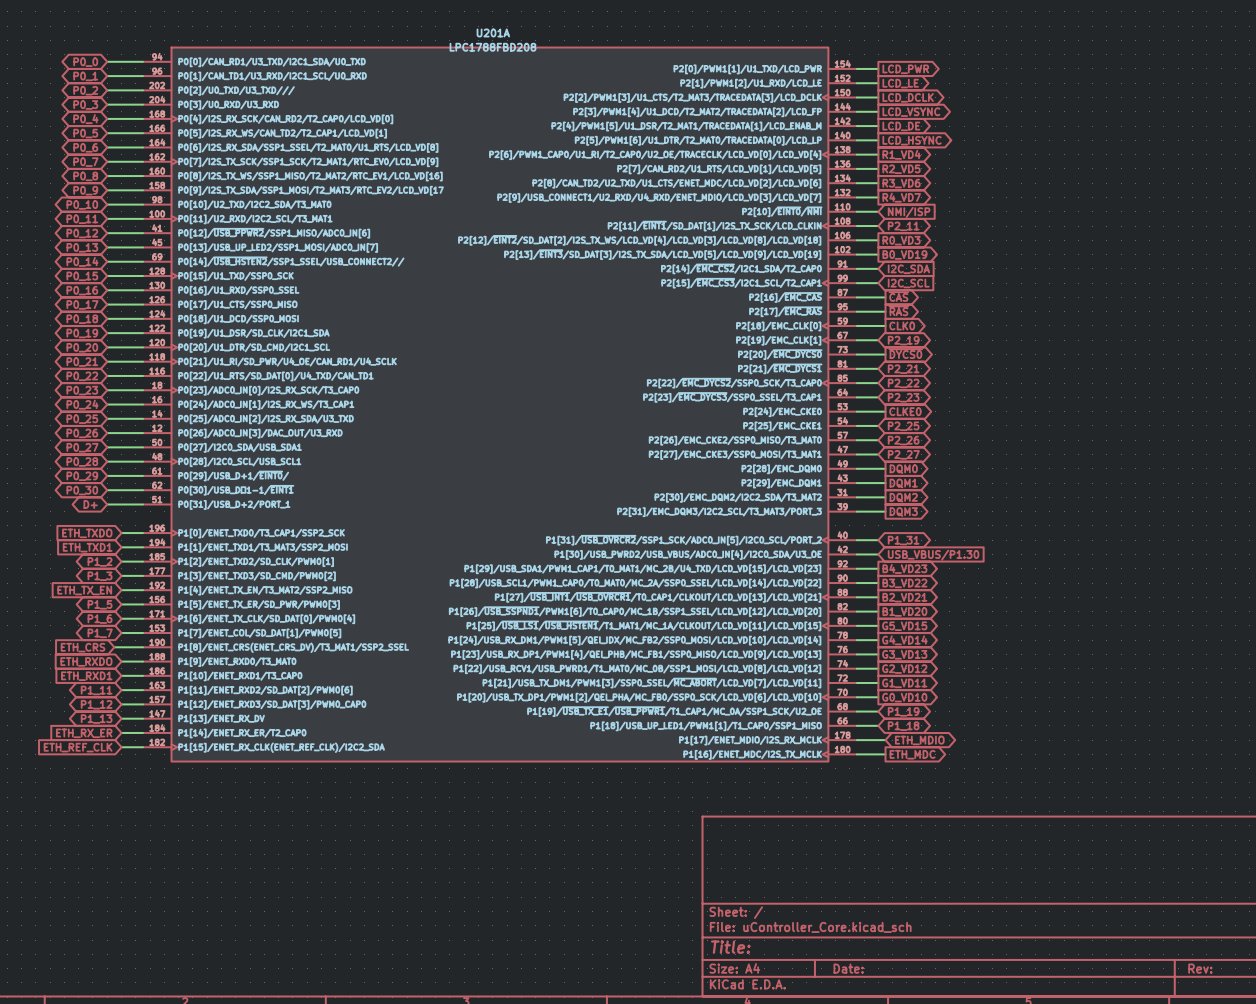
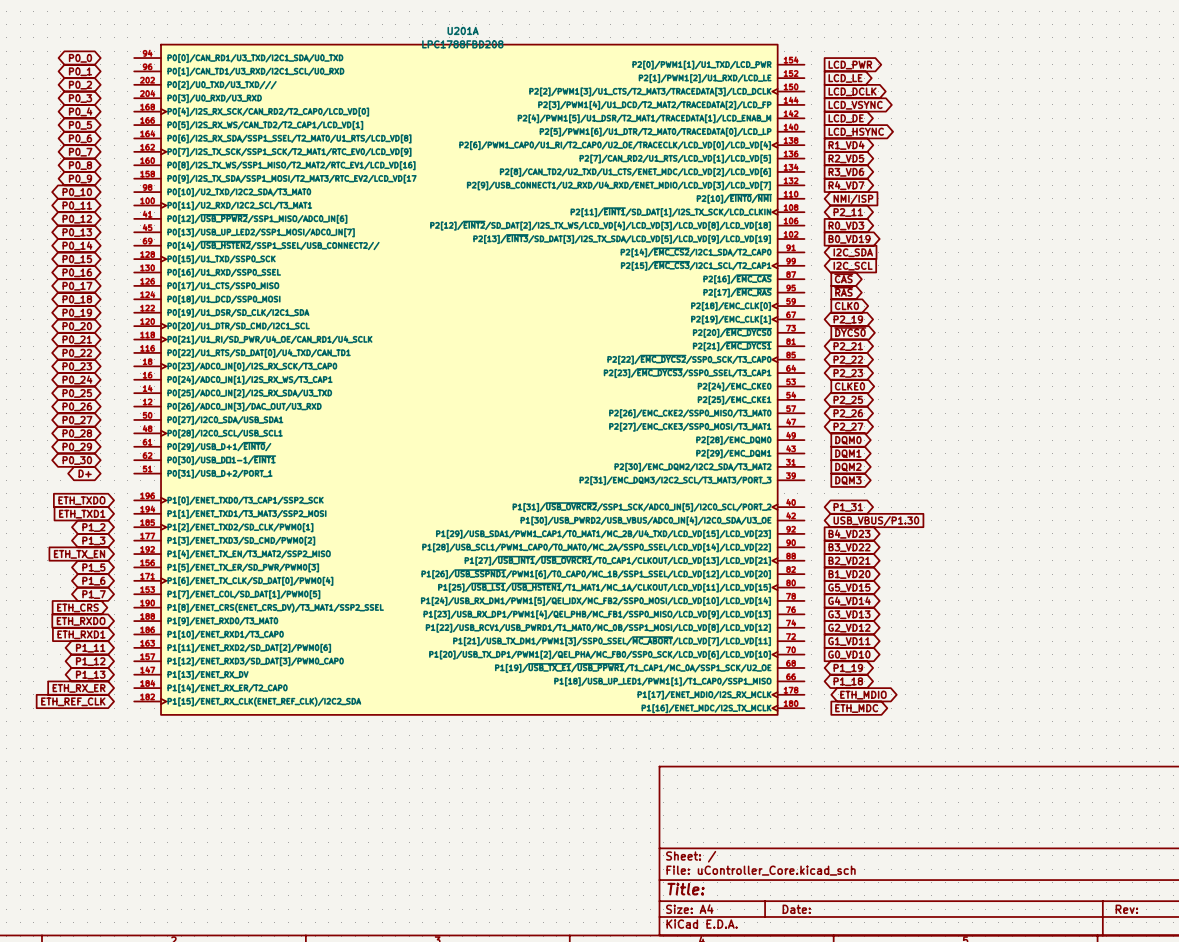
wire: (107, 61) (142, 61) -> none
wire: (856, 68) (878, 68) -> none
wire: (107, 76) (142, 76) -> none
wire: (856, 83) (878, 83) -> none
wire: (107, 90) (142, 90) -> none
wire: (856, 97) (878, 97) -> none
wire: (107, 104) (142, 104) -> none
wire: (856, 111) (878, 111) -> none
wire: (107, 118) (142, 118) -> none
wire: (856, 126) (878, 126) -> none
wire: (107, 133) (142, 133) -> none
wire: (856, 140) (878, 140) -> none
wire: (107, 147) (142, 147) -> none
wire: (856, 154) (878, 154) -> none
wire: (107, 161) (142, 161) -> none
wire: (856, 168) (878, 168) -> none
wire: (107, 176) (142, 176) -> none
wire: (856, 183) (878, 183) -> none
wire: (107, 190) (142, 190) -> none
wire: (856, 197) (878, 197) -> none
wire: (107, 204) (142, 204) -> none
wire: (856, 211) (878, 211) -> none
wire: (107, 218) (142, 218) -> none
wire: (856, 226) (878, 226) -> none
wire: (107, 233) (142, 233) -> none
wire: (856, 240) (878, 240) -> none
wire: (107, 247) (142, 247) -> none
wire: (856, 254) (878, 254) -> none
wire: (107, 261) (142, 261) -> none
wire: (856, 268) (878, 268) -> none
wire: (107, 276) (142, 276) -> none
wire: (856, 283) (878, 283) -> none
wire: (107, 290) (142, 290) -> none
wire: (856, 297) (885, 297) -> none
wire: (107, 304) (142, 304) -> none
wire: (856, 311) (885, 311) -> none
wire: (107, 318) (142, 318) -> none
wire: (856, 325) (885, 325) -> none
wire: (107, 333) (142, 333) -> none
wire: (856, 340) (878, 340) -> none
wire: (107, 347) (142, 347) -> none
wire: (856, 354) (885, 354) -> none
wire: (107, 361) (142, 361) -> none
wire: (856, 368) (878, 368) -> none
wire: (107, 375) (142, 375) -> none
wire: (856, 383) (878, 383) -> none
wire: (107, 390) (142, 390) -> none
wire: (856, 397) (878, 397) -> none
wire: (107, 404) (142, 404) -> none
wire: (856, 411) (885, 411) -> none
wire: (107, 418) (142, 418) -> none
wire: (856, 425) (878, 425) -> none
wire: (107, 433) (142, 433) -> none
wire: (856, 440) (878, 440) -> none
wire: (107, 447) (142, 447) -> none
wire: (856, 454) (878, 454) -> none
wire: (107, 461) (142, 461) -> none
wire: (856, 468) (885, 468) -> none
wire: (107, 475) (142, 475) -> none
wire: (856, 483) (885, 483) -> none
wire: (107, 490) (142, 490) -> none
wire: (856, 497) (885, 497) -> none
wire: (107, 504) (142, 504) -> none
wire: (856, 511) (885, 511) -> none
wire: (121, 533) (142, 533) -> none
wire: (856, 540) (878, 540) -> none
wire: (121, 547) (142, 547) -> none
wire: (856, 554) (878, 554) -> none
wire: (121, 561) (142, 561) -> none
wire: (856, 568) (878, 568) -> none
wire: (121, 575) (142, 575) -> none
wire: (856, 583) (878, 583) -> none
wire: (121, 590) (142, 590) -> none
wire: (856, 597) (878, 597) -> none
wire: (121, 604) (142, 604) -> none
wire: (856, 611) (878, 611) -> none
wire: (121, 618) (142, 618) -> none
wire: (856, 625) (878, 625) -> none
wire: (121, 633) (142, 633) -> none
wire: (856, 640) (878, 640) -> none
wire: (114, 647) (142, 647) -> none
wire: (856, 654) (878, 654) -> none
wire: (121, 661) (142, 661) -> none
wire: (856, 668) (878, 668) -> none
wire: (121, 675) (142, 675) -> none
wire: (856, 682) (878, 682) -> none
wire: (121, 690) (142, 690) -> none
wire: (856, 697) (878, 697) -> none
wire: (121, 704) (142, 704) -> none
wire: (856, 711) (878, 711) -> none
wire: (121, 718) (142, 718) -> none
wire: (856, 725) (878, 725) -> none
wire: (121, 732) (142, 732) -> none
wire: (856, 740) (885, 740) -> none
wire: (121, 747) (142, 747) -> none
wire: (856, 754) (885, 754) -> none

